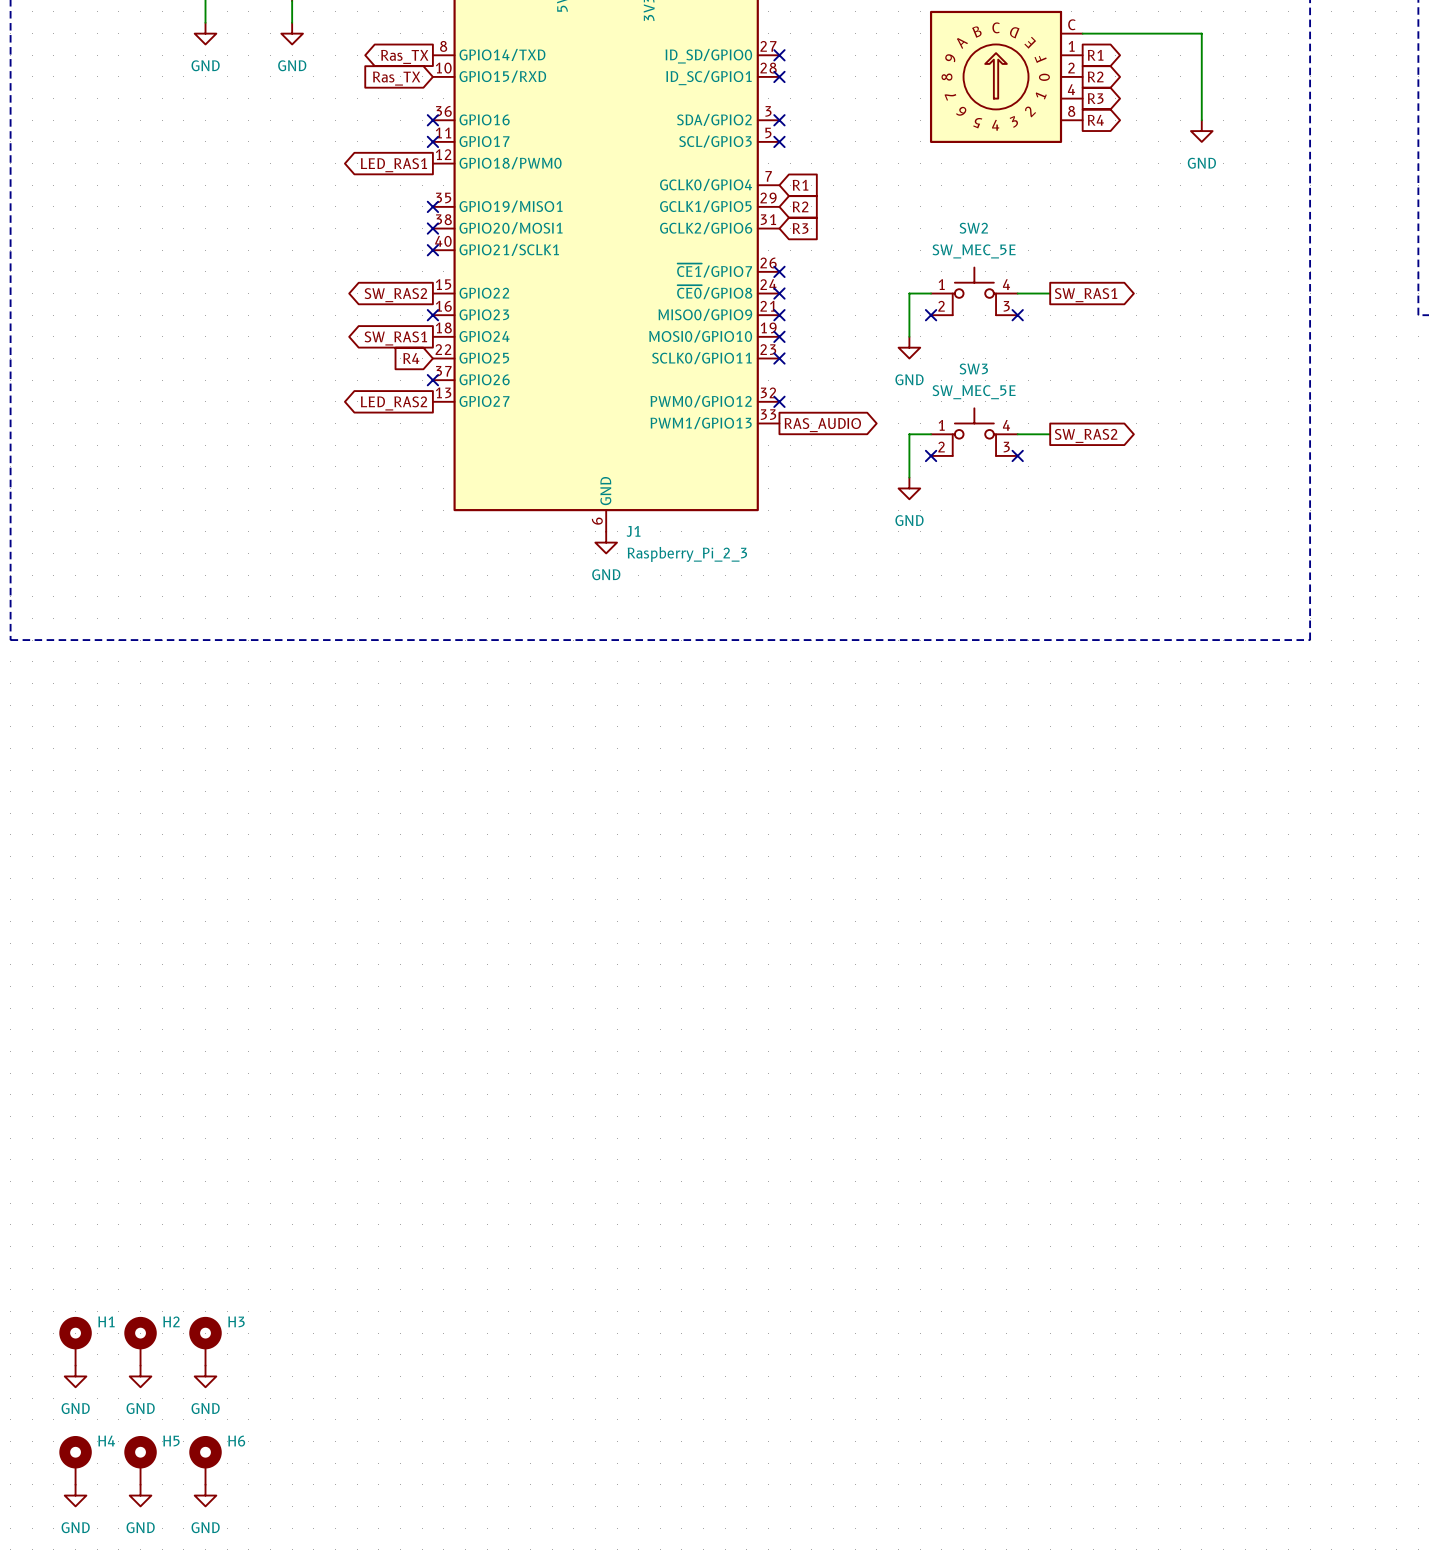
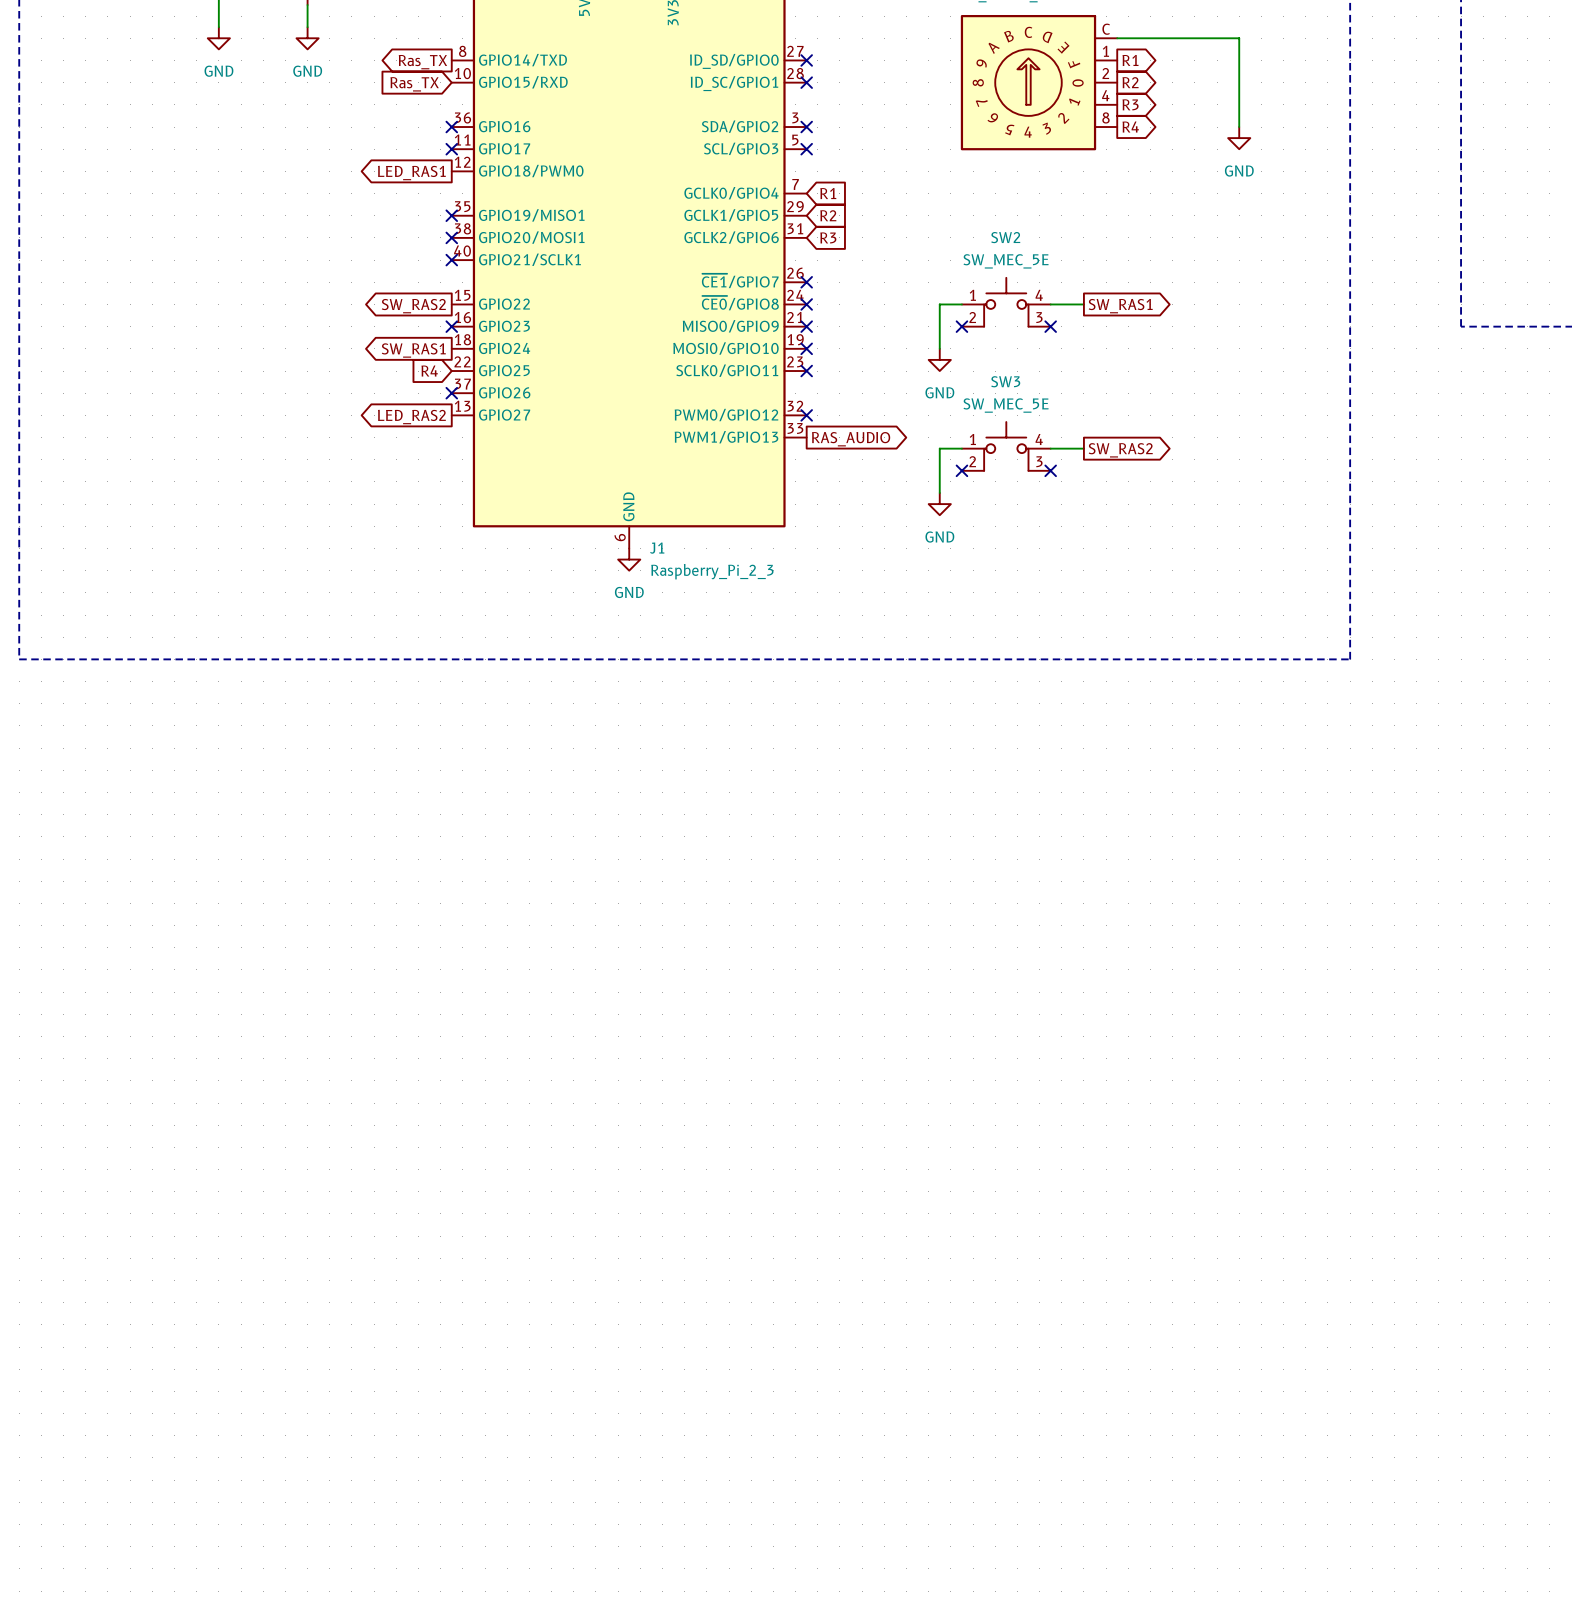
H1: (75, 1341) -> none
H2: (140, 1341) -> none
H3: (205, 1341) -> none
power symbol: GND (75, 1376) -> none
power symbol: GND (140, 1376) -> none
power symbol: GND (205, 1376) -> none
H4: (75, 1460) -> none
H5: (140, 1460) -> none
H6: (205, 1460) -> none
power symbol: GND (75, 1495) -> none
power symbol: GND (140, 1495) -> none
power symbol: GND (205, 1495) -> none

